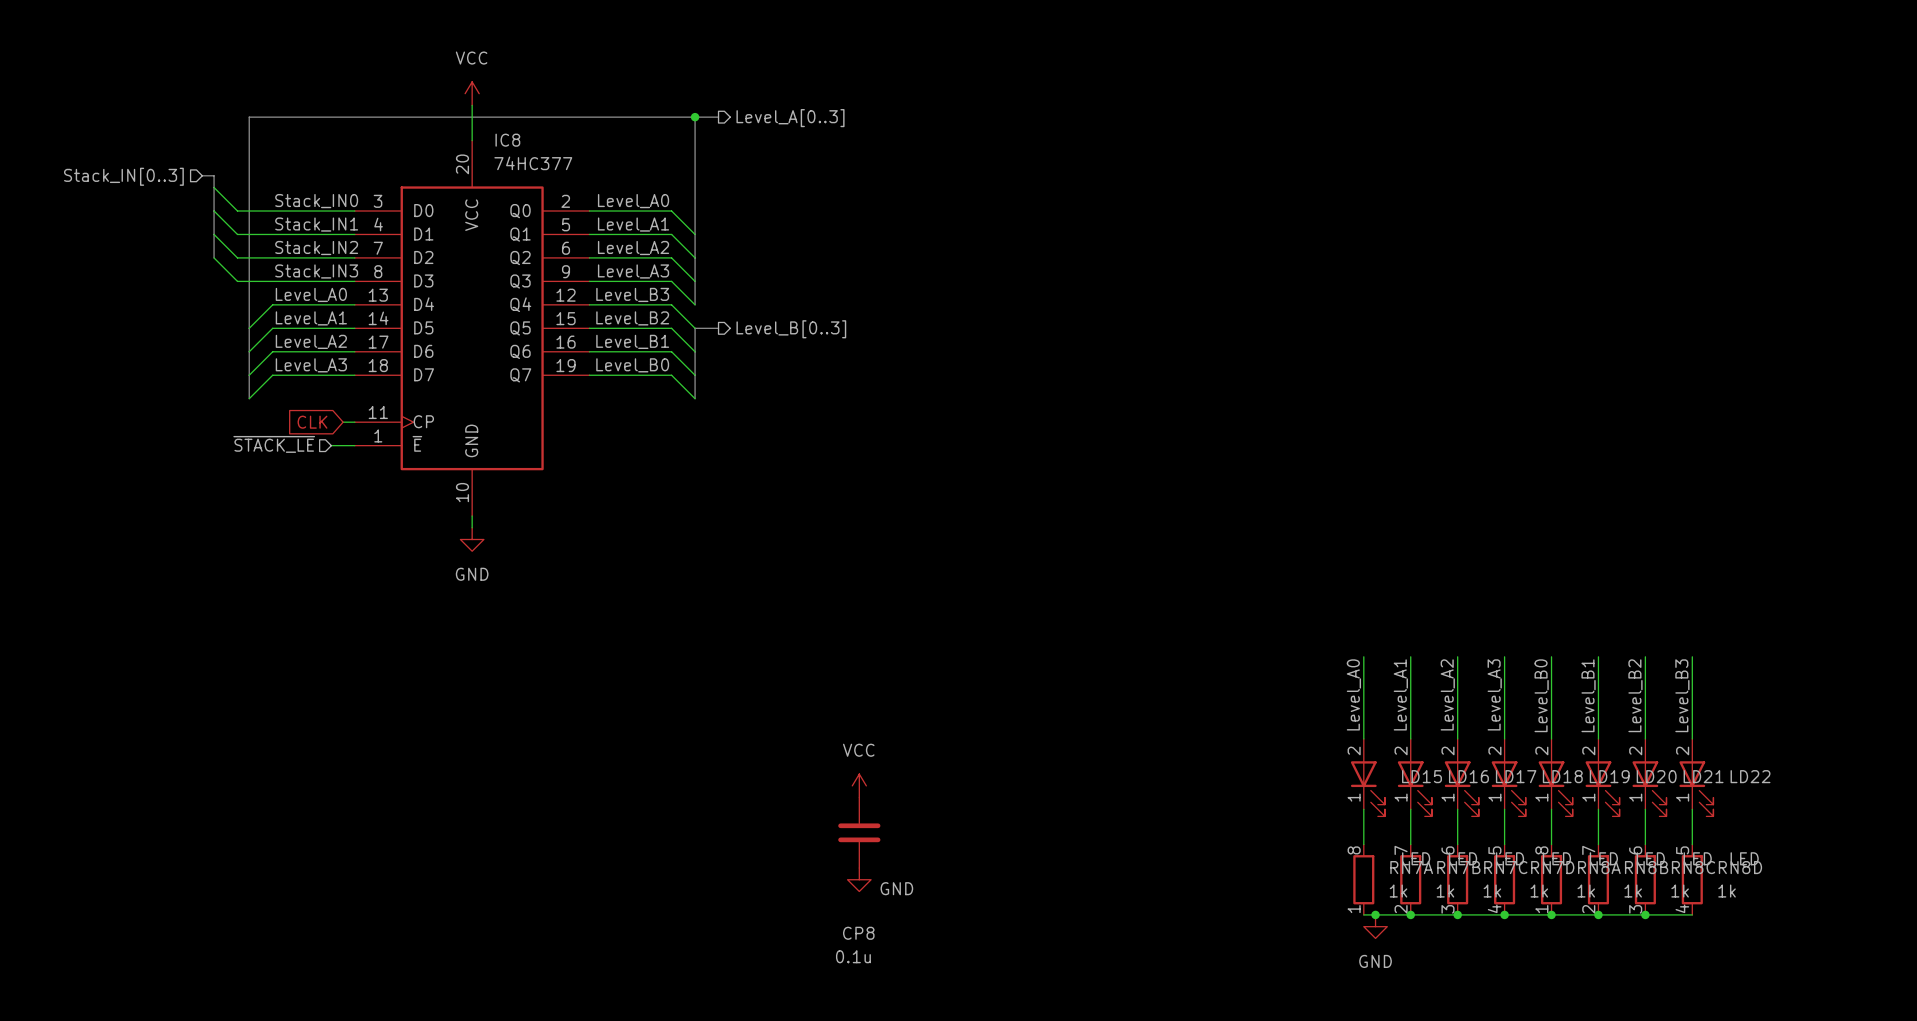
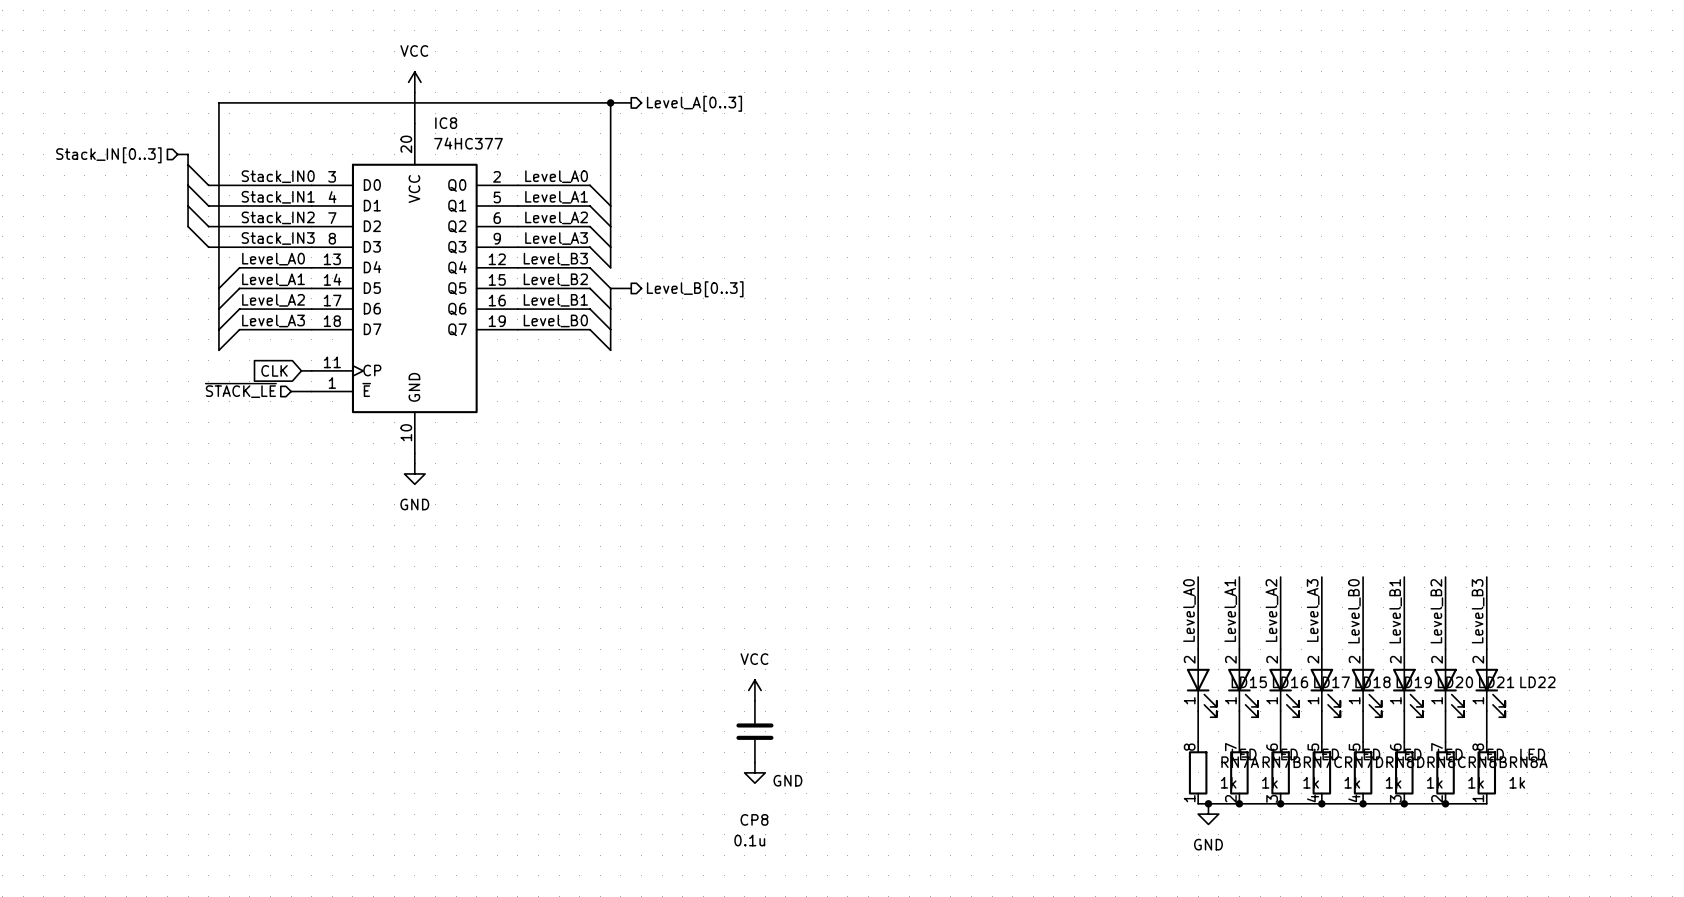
RN8A position: (1551, 879) -> (1486, 772)
RN8B position: (1598, 879) -> (1445, 772)
RN8C position: (1645, 879) -> (1404, 772)
RN8D position: (1692, 879) -> (1363, 772)

